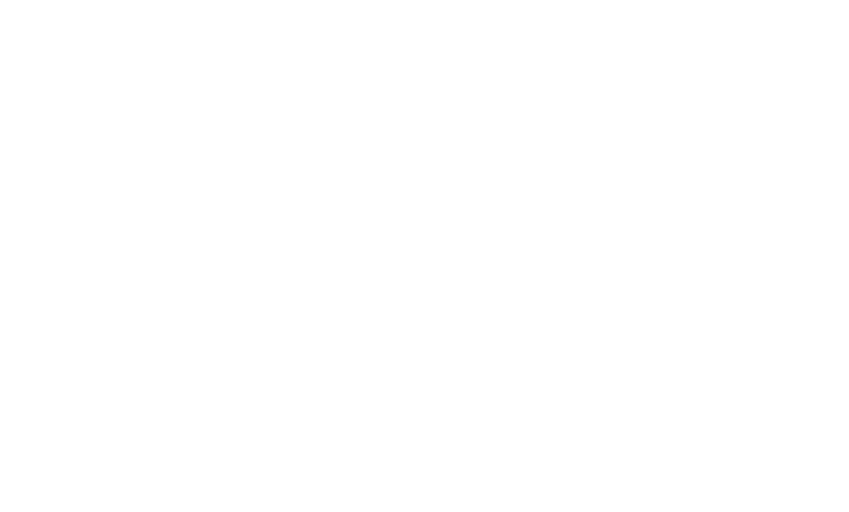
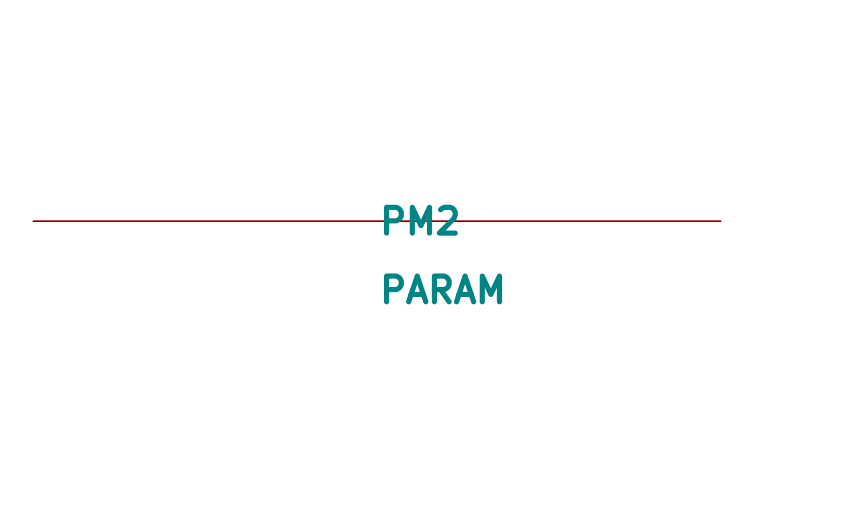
PM2: none -> PARAM (377, 221)

